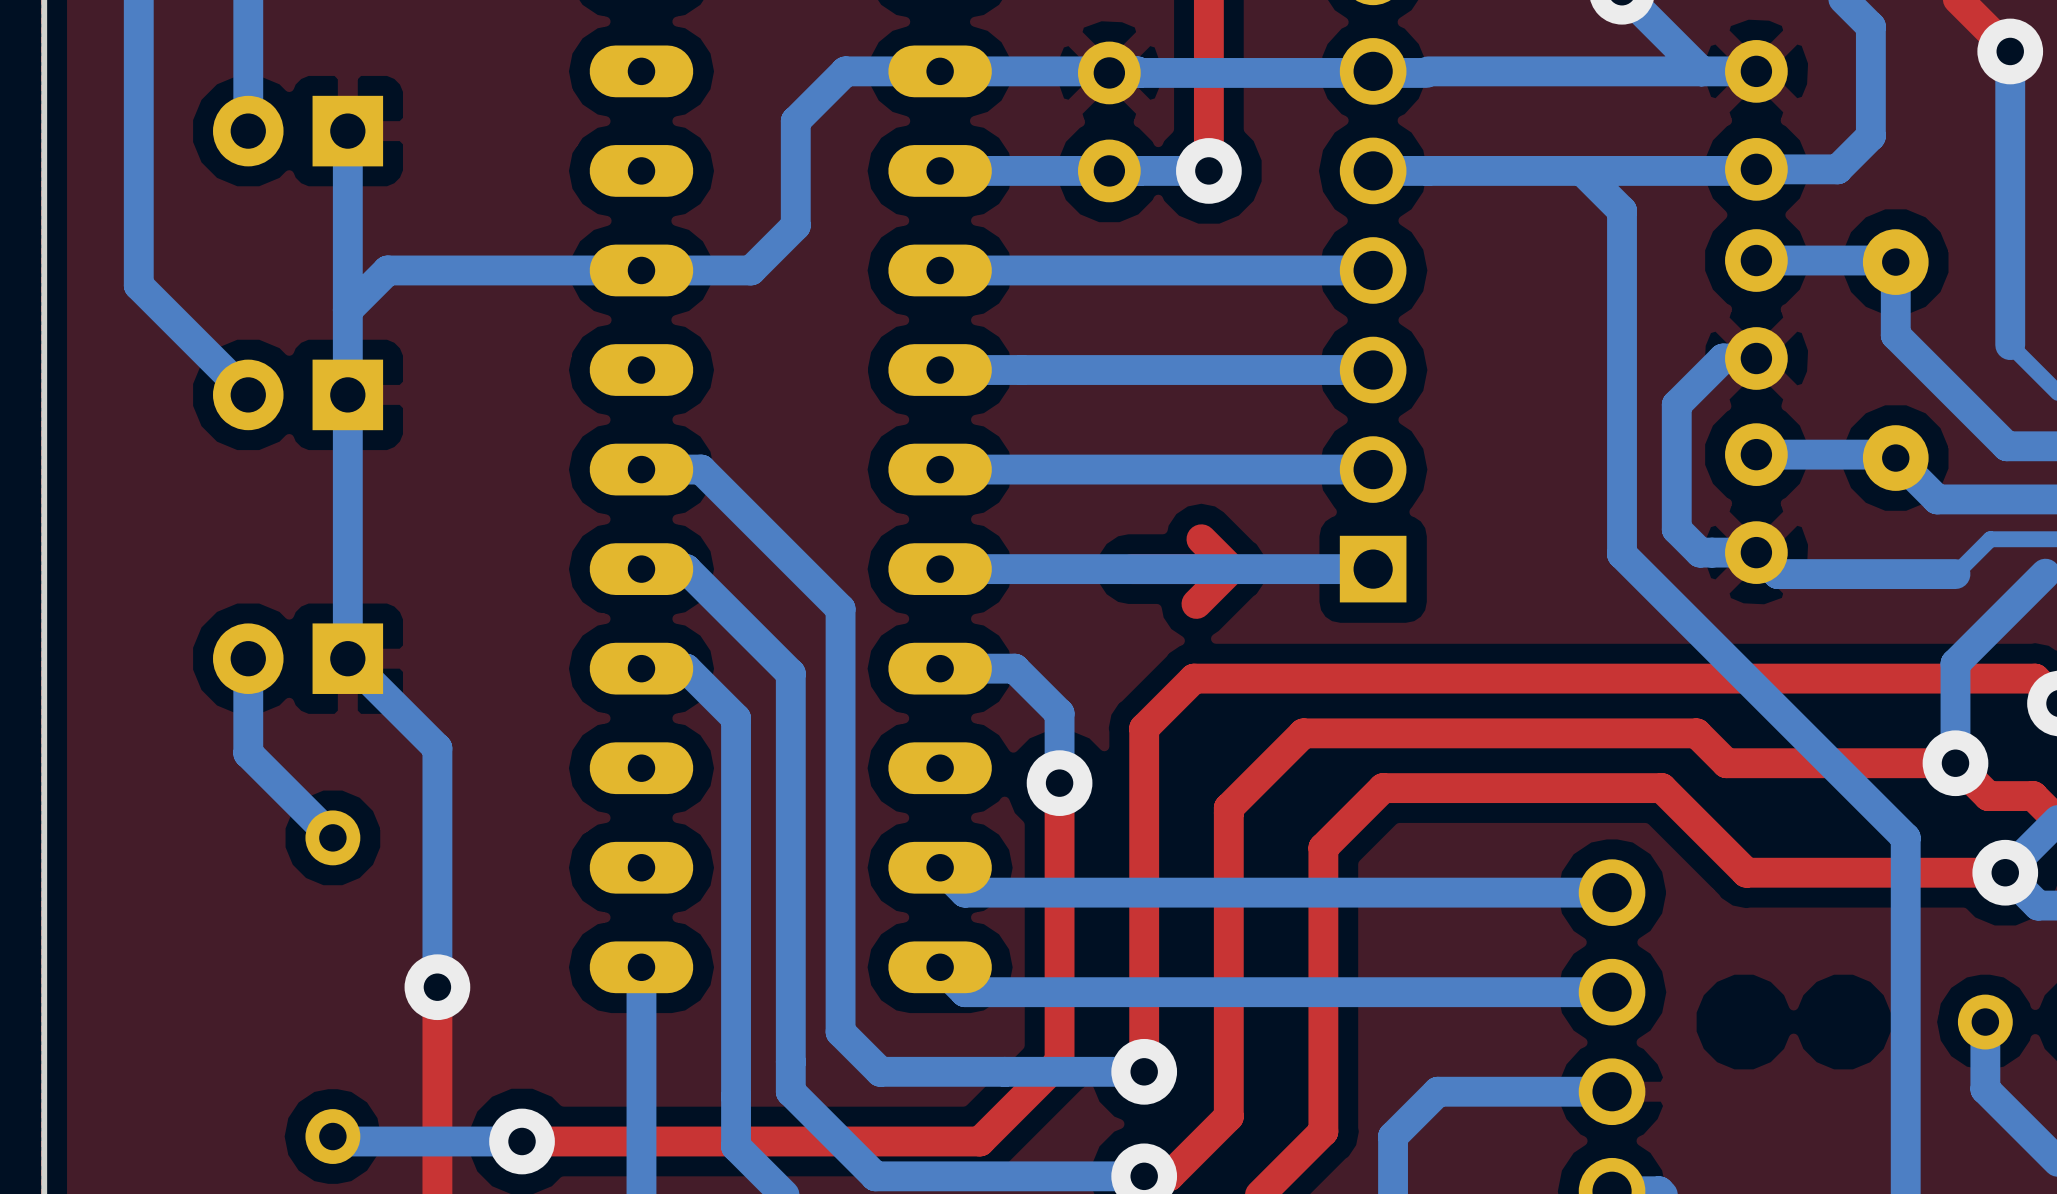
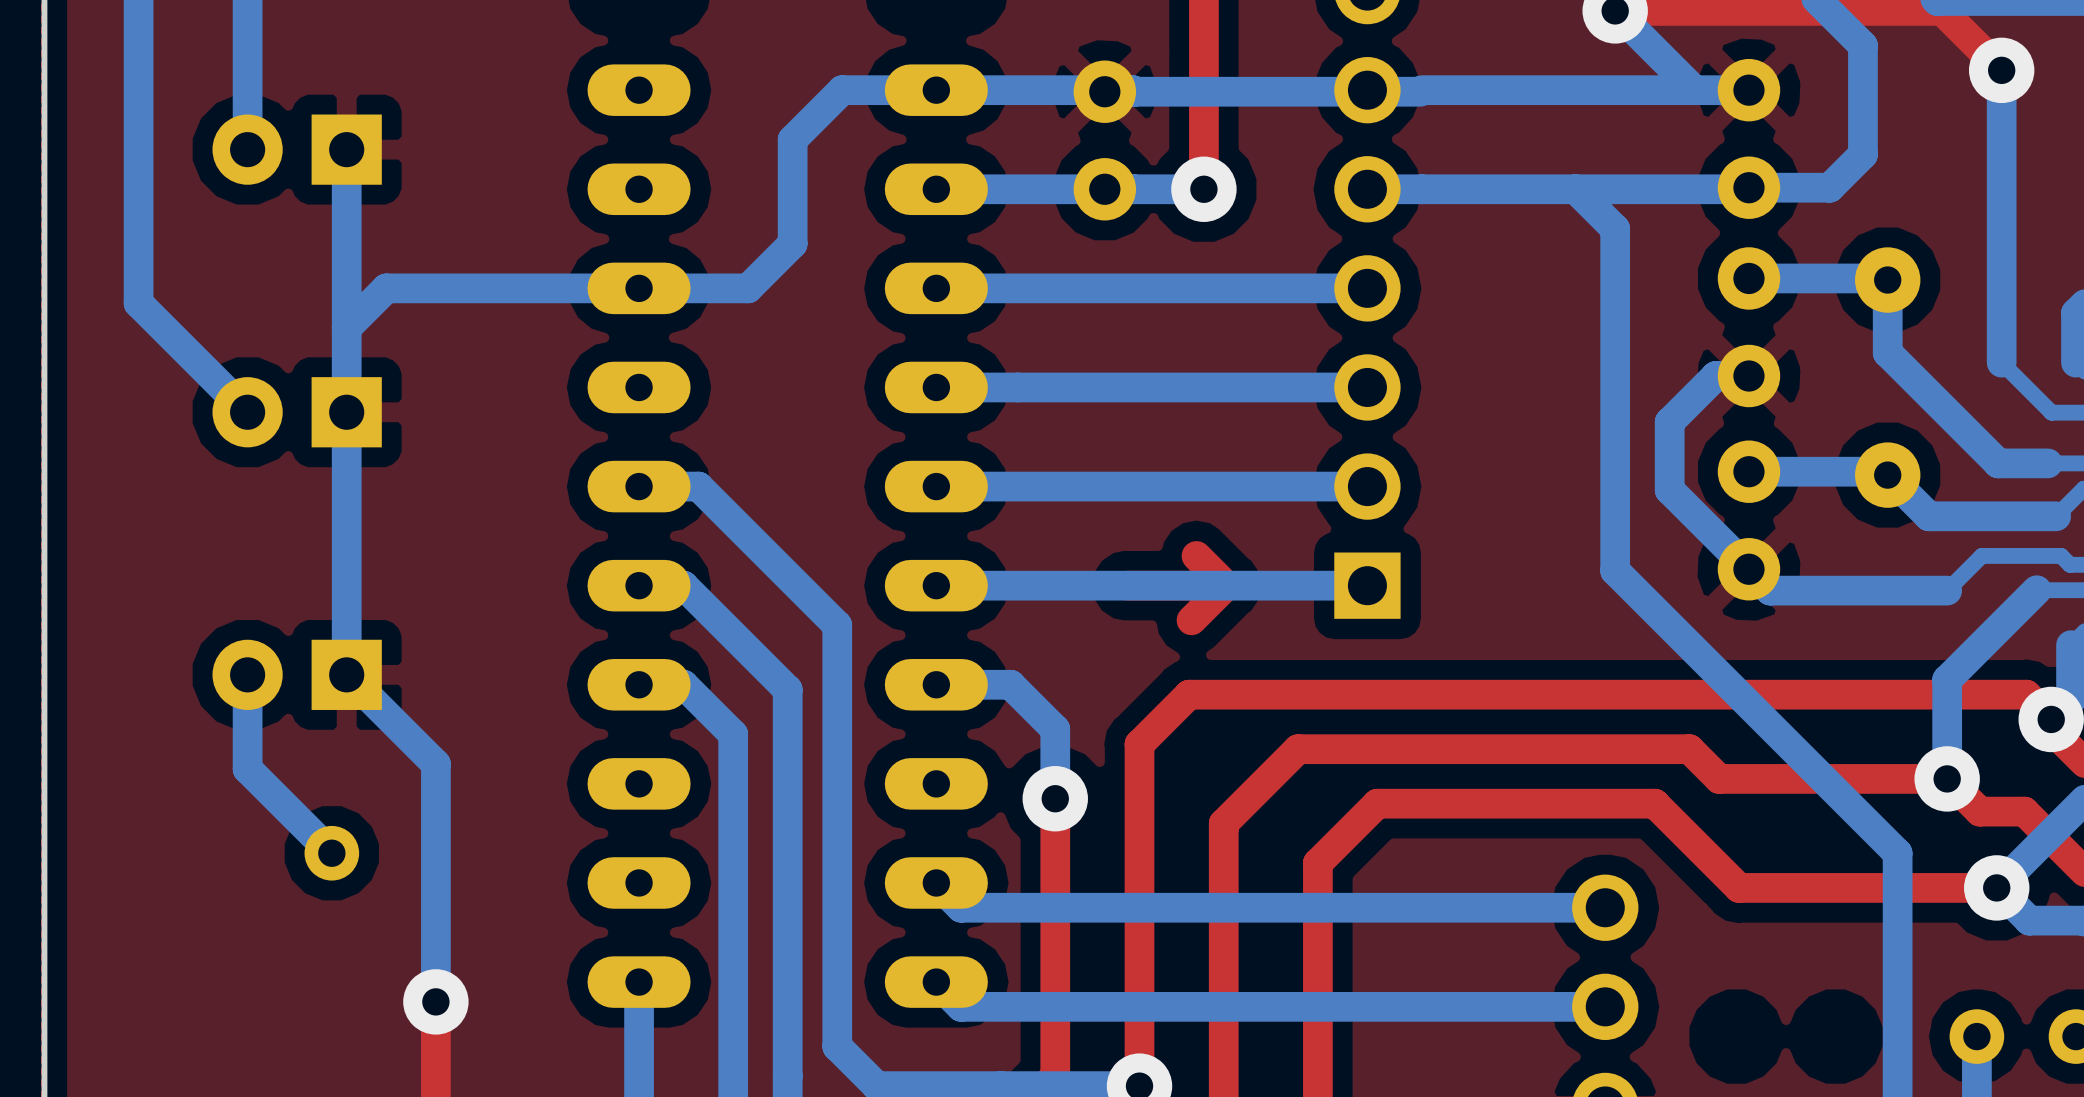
bottom track: (1676, 472) (1676, 529) (1700, 552) (1754, 552) -> (1669, 489) (1748, 569)

